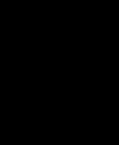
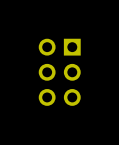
part: none -> (59, 72)

